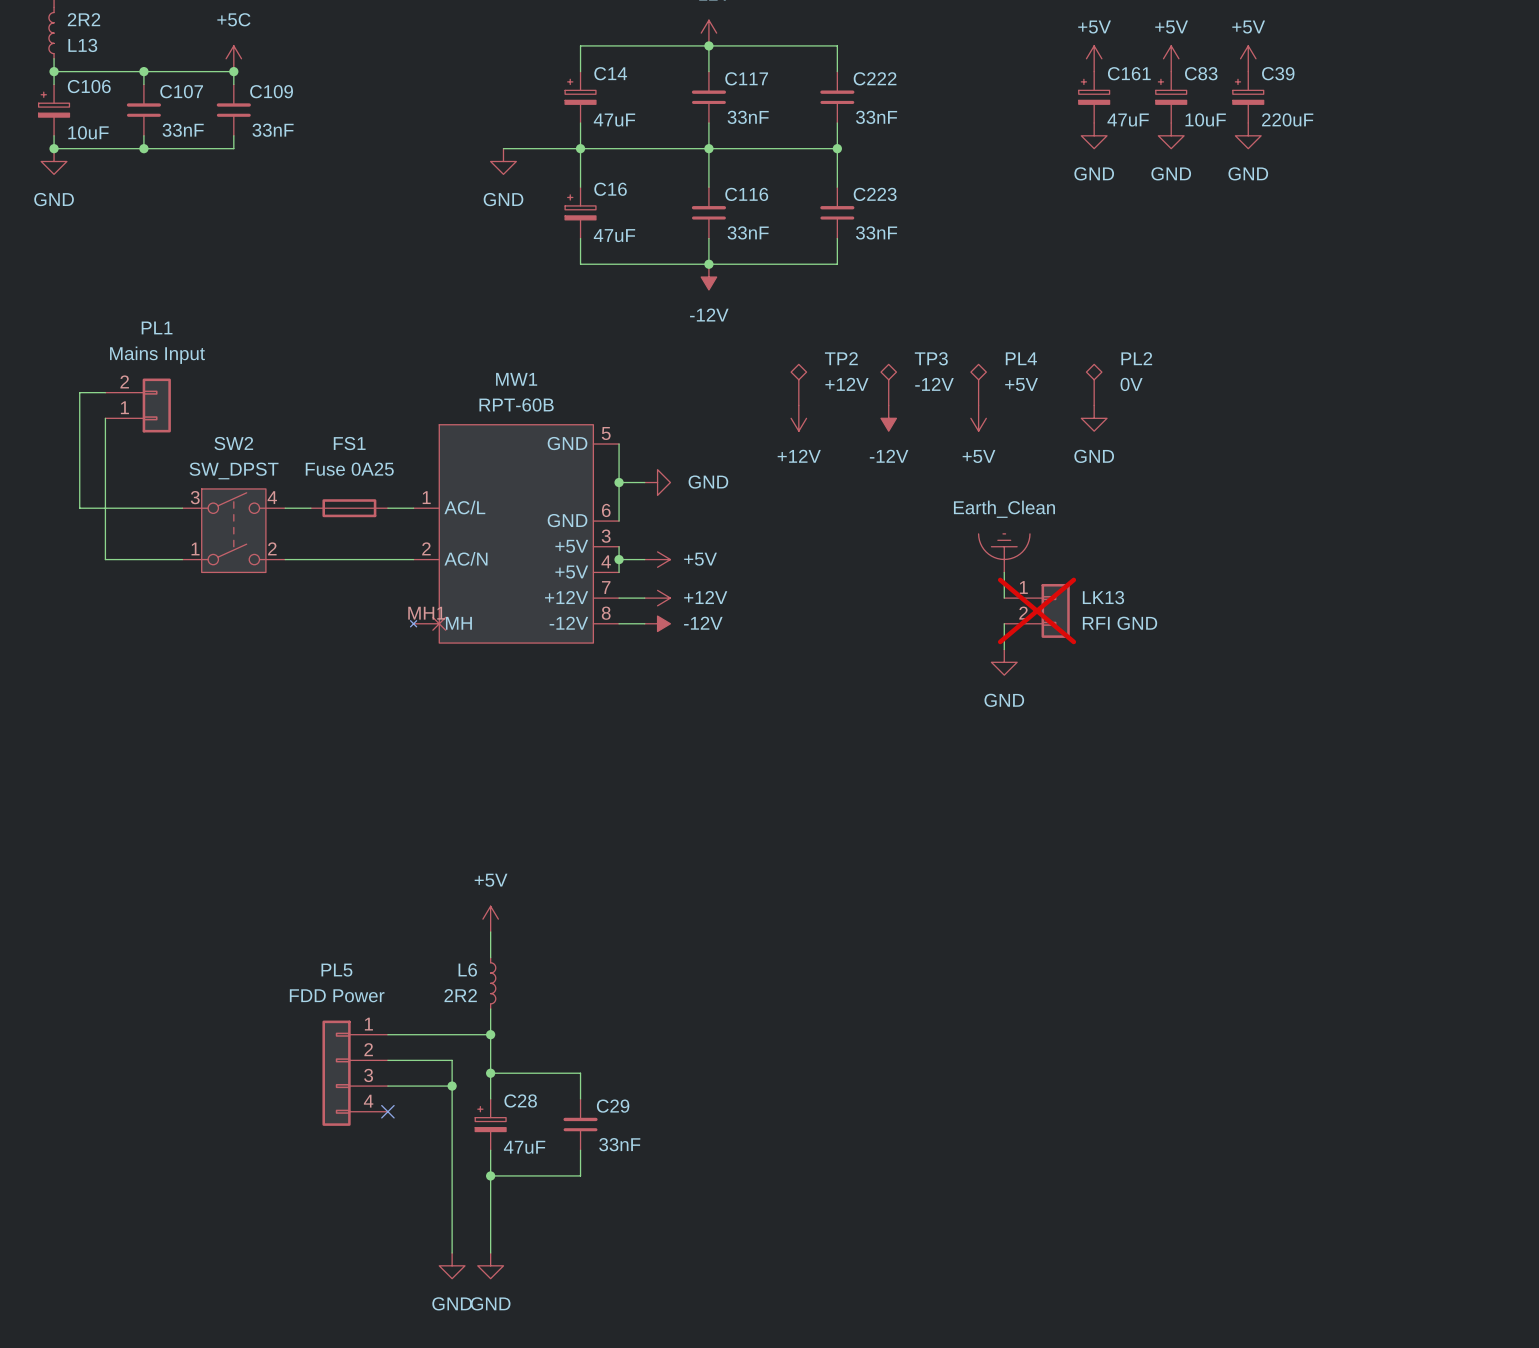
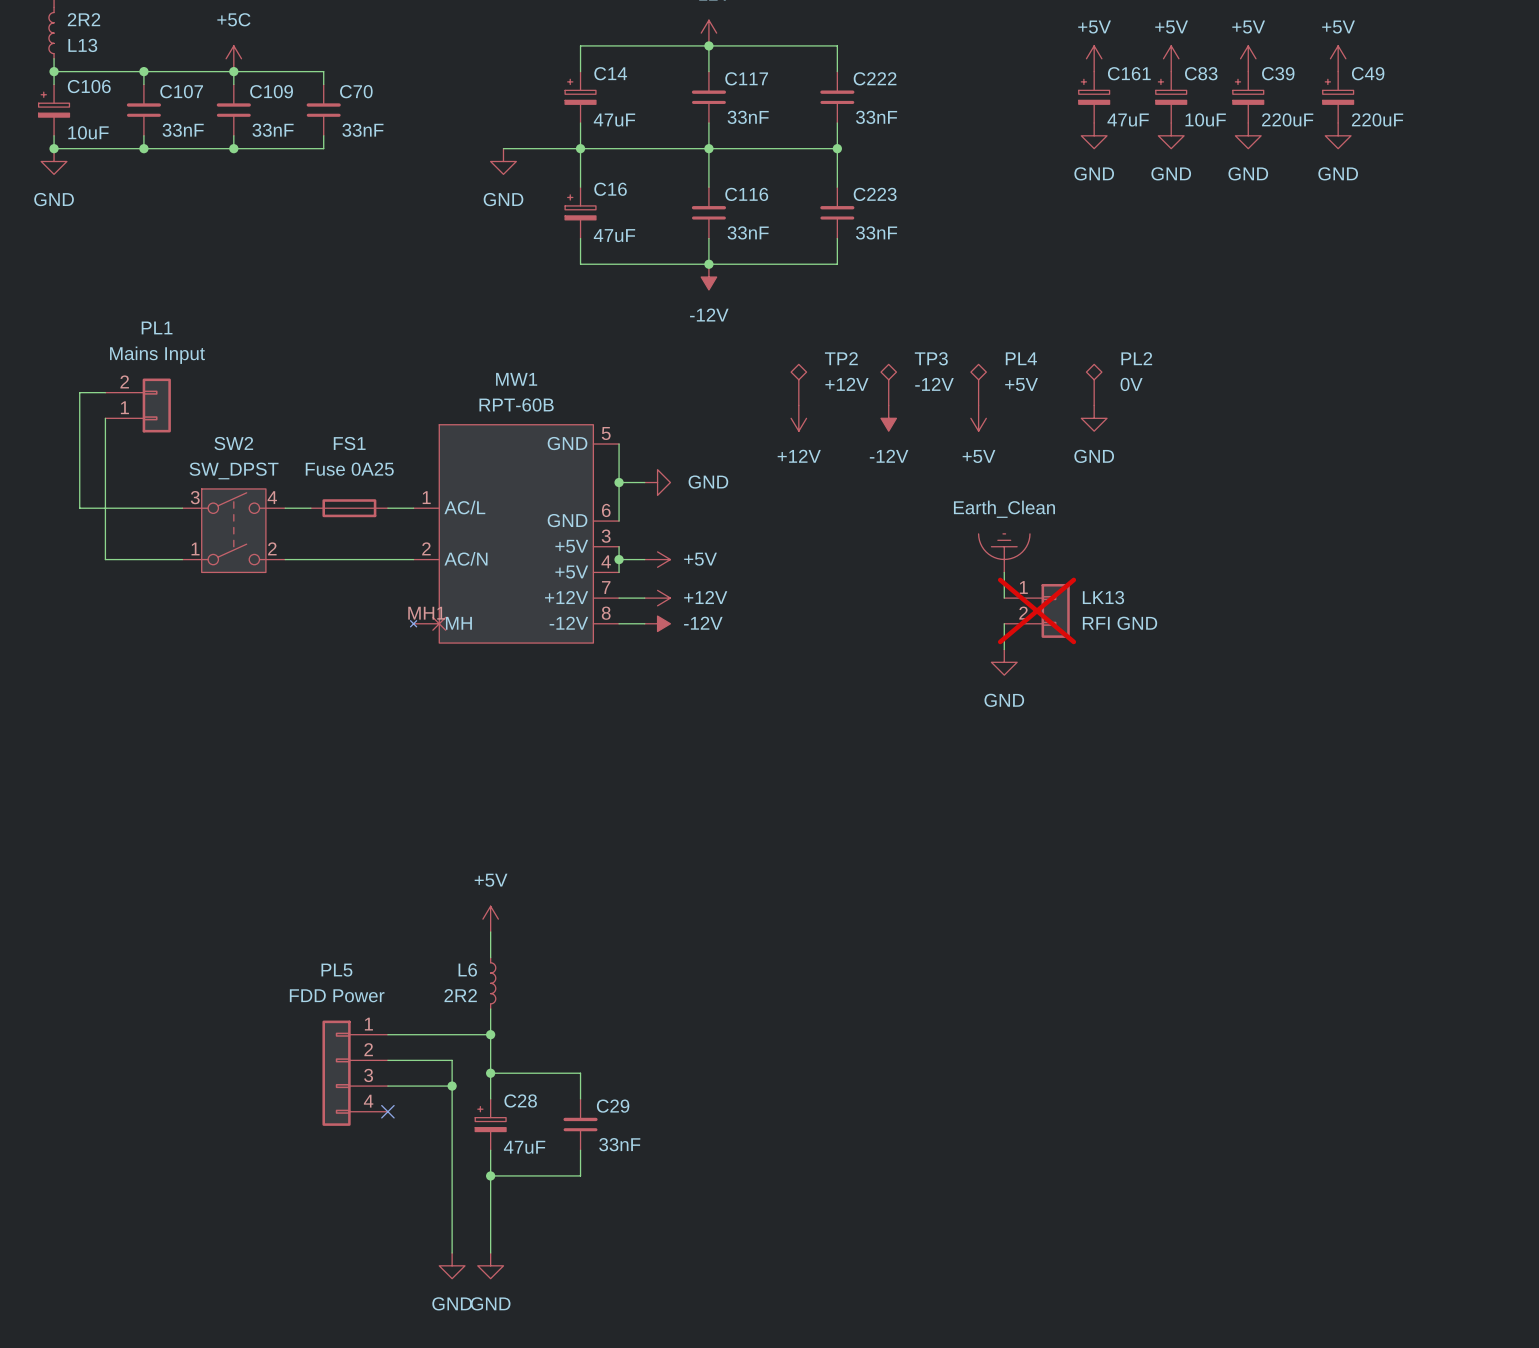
power symbol: none -> +5V (1338, 58)
wire: none -> (233, 71) (323, 71) (323, 84)
C49: none -> 220uF (1338, 97)
C70: none -> 33nF (323, 110)
wire: none -> (323, 135) (323, 148) (233, 148)
power symbol: none -> GND (1338, 135)
junction: none -> (233, 148)

